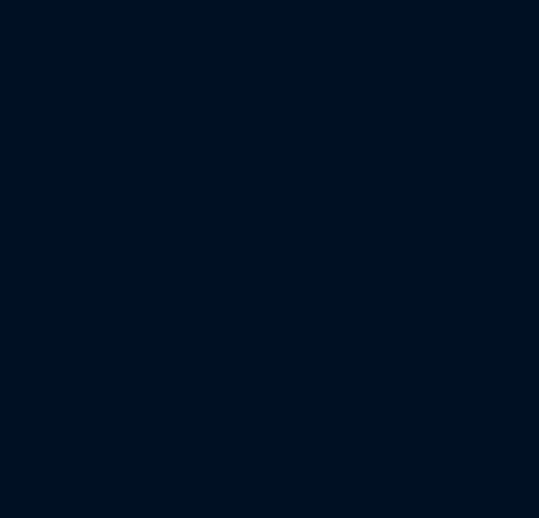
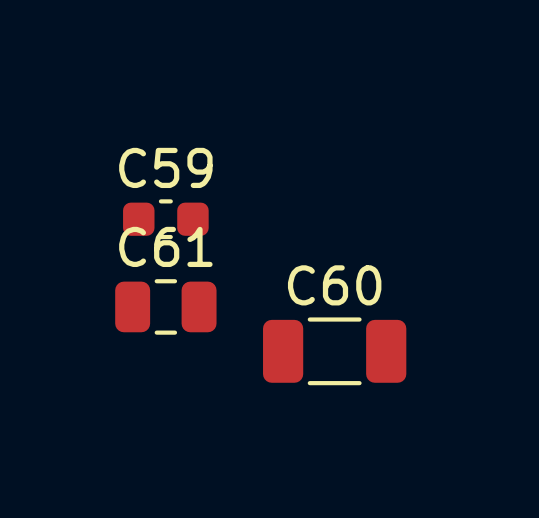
C59: none -> (165, 219)
C61: none -> (165, 306)
C60: none -> (334, 351)

